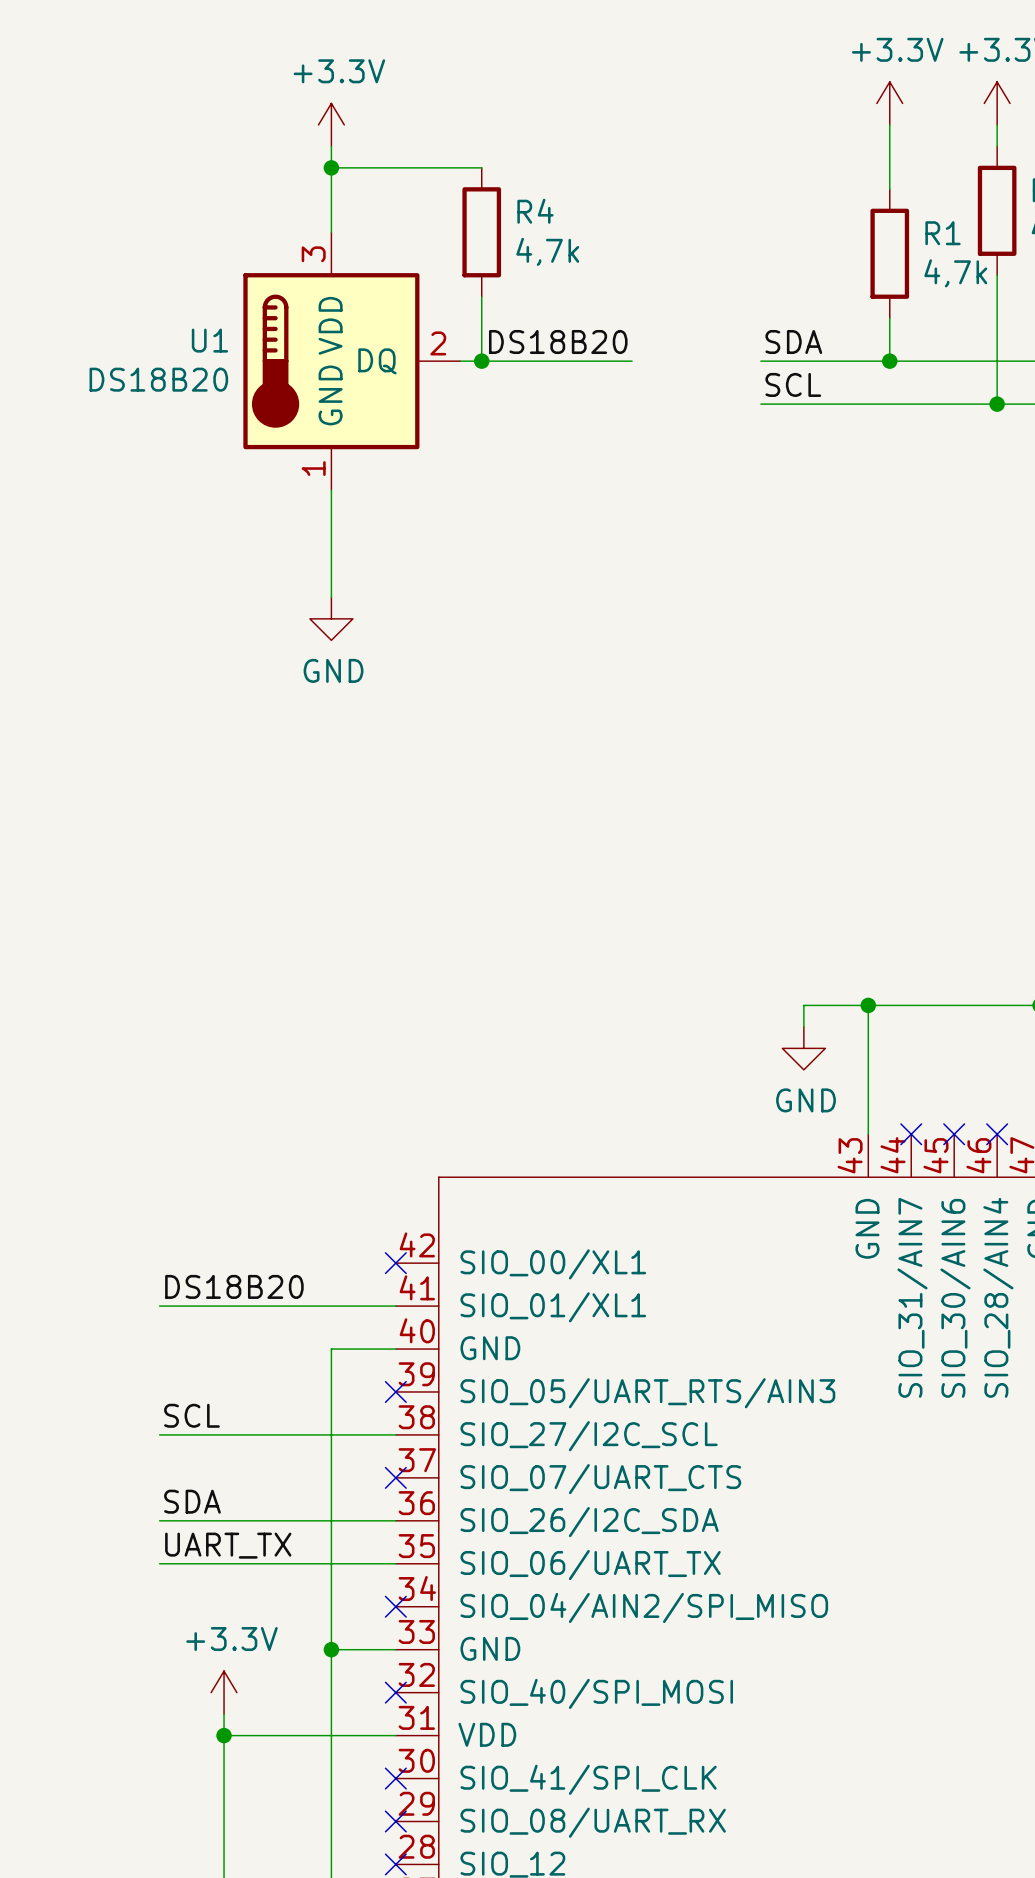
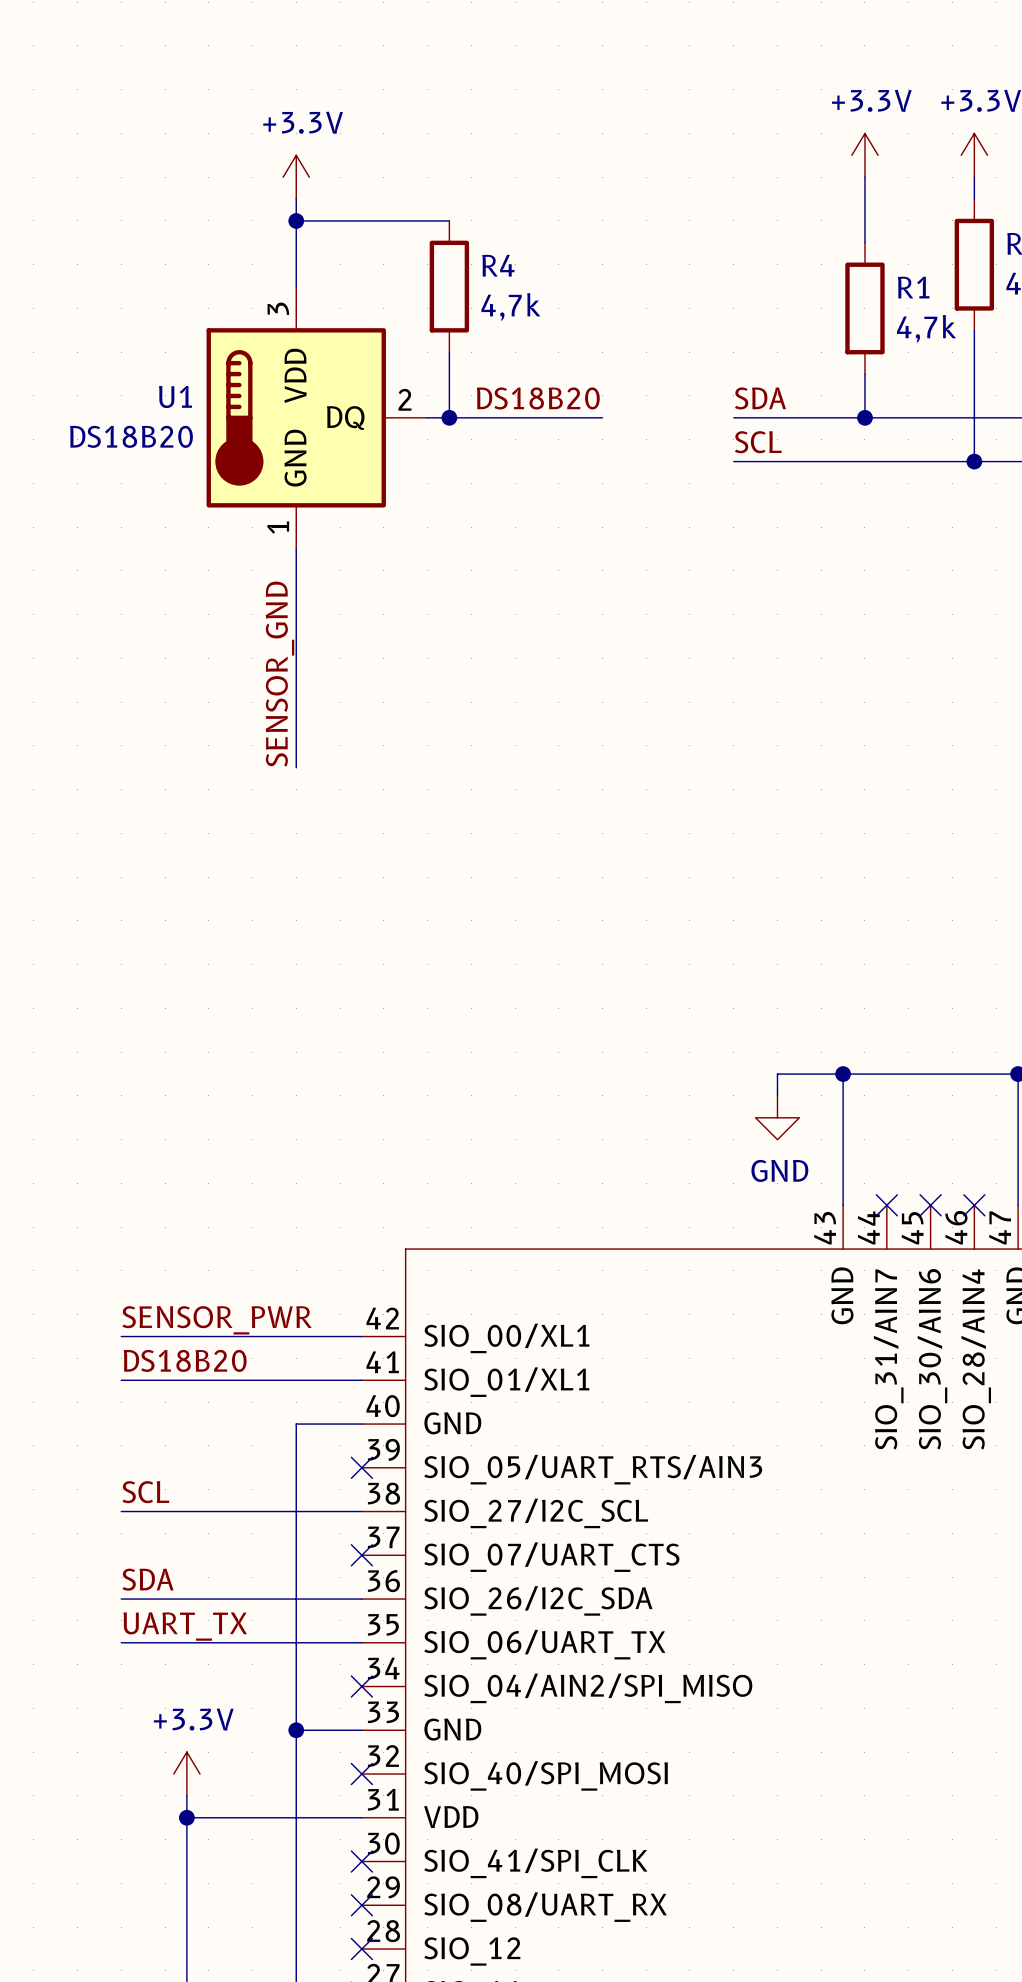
wire: none -> (296, 658) (296, 767)
label: none -> SENSOR_GND (280, 674)
power symbol: GND (331, 618) -> none
label: none -> SENSOR_PWR (217, 1320)
wire: none -> (121, 1336) (361, 1336)
no-connect mark: (395, 1263) -> none

